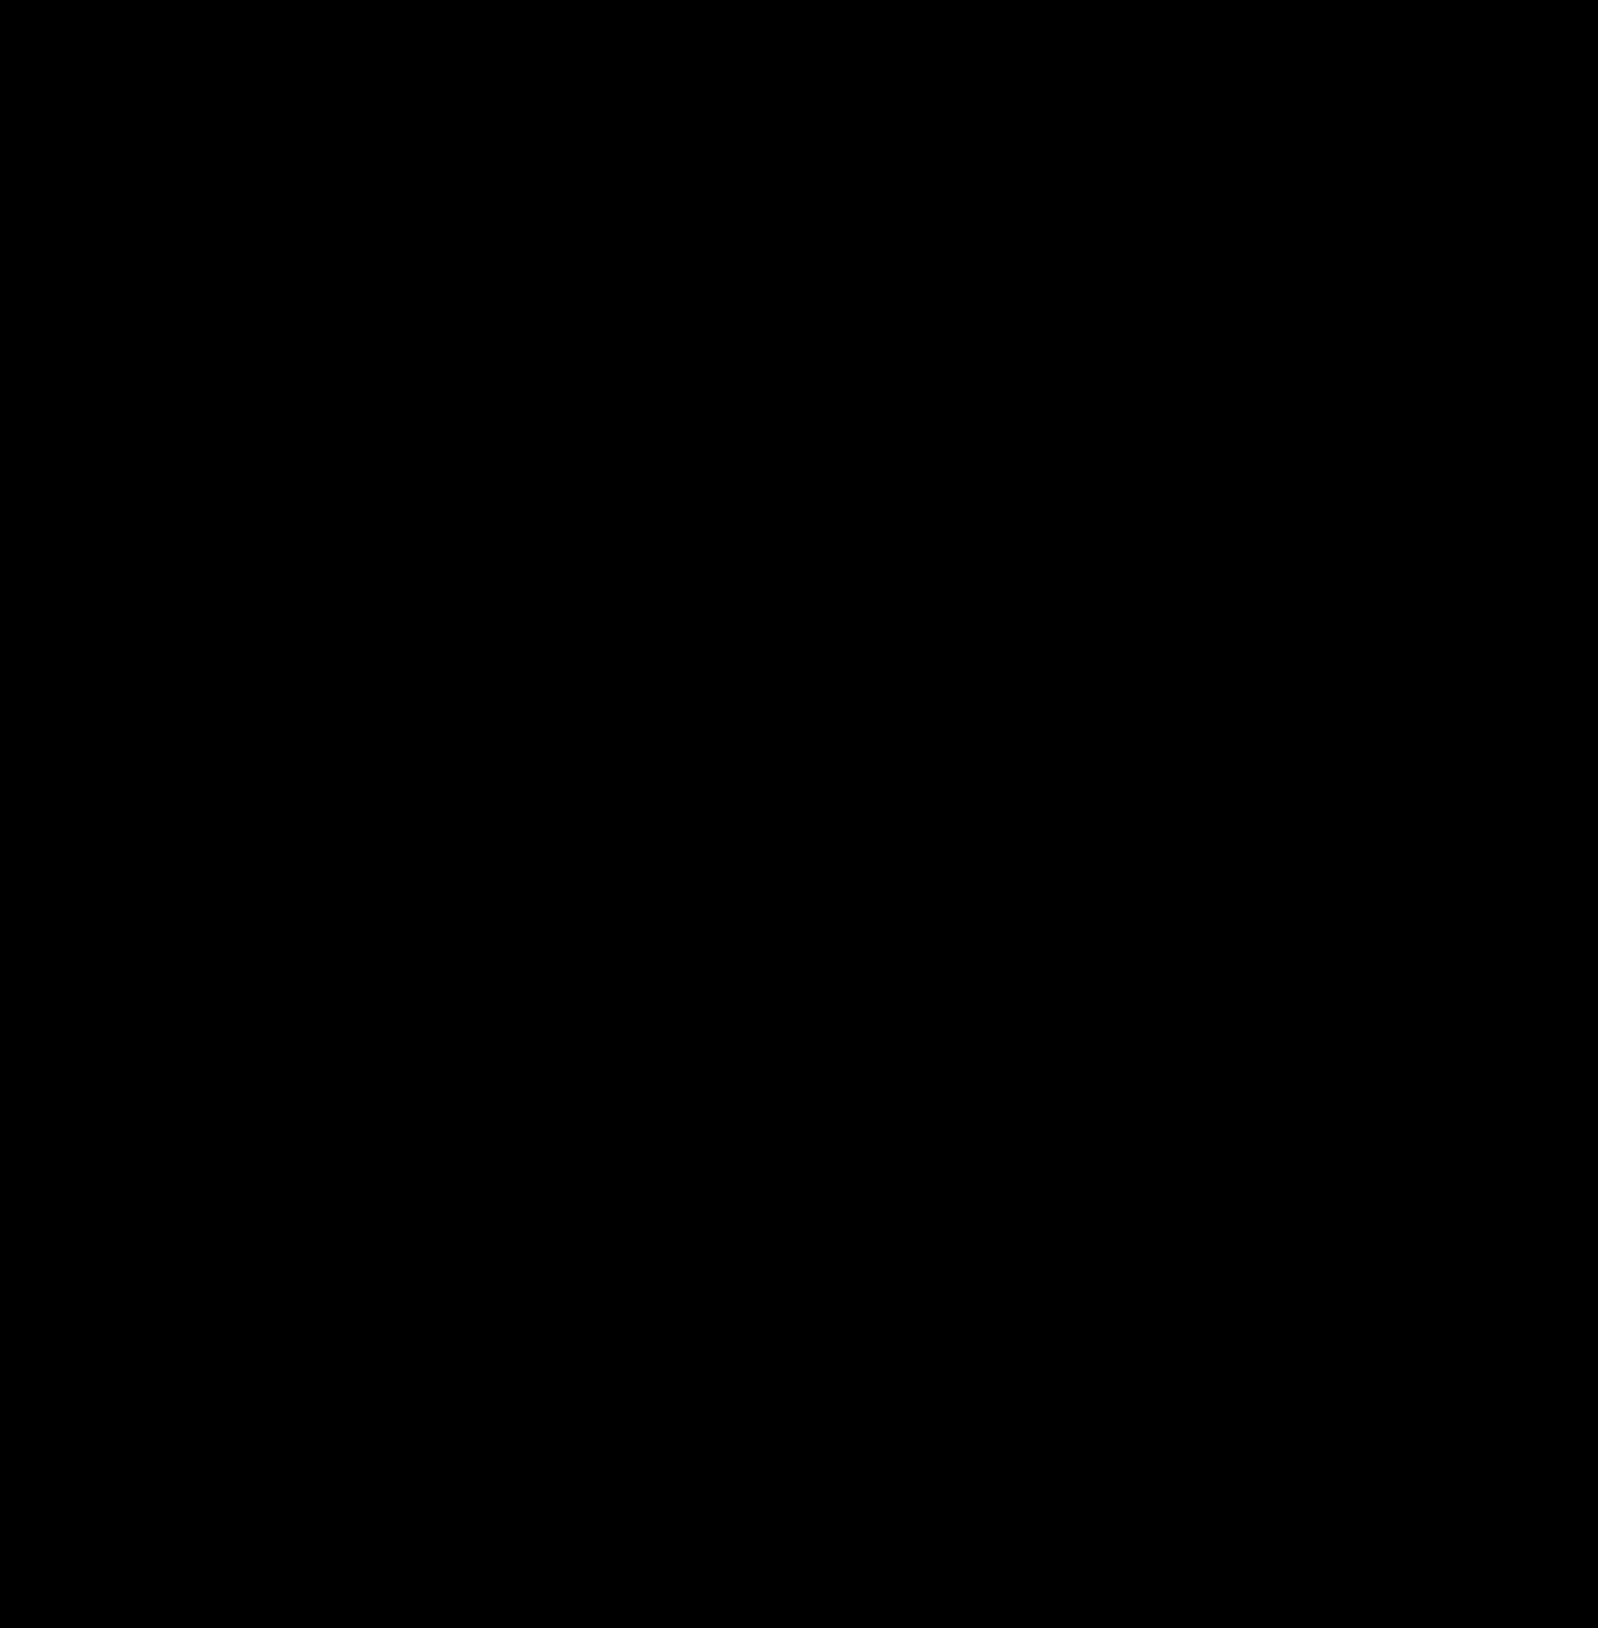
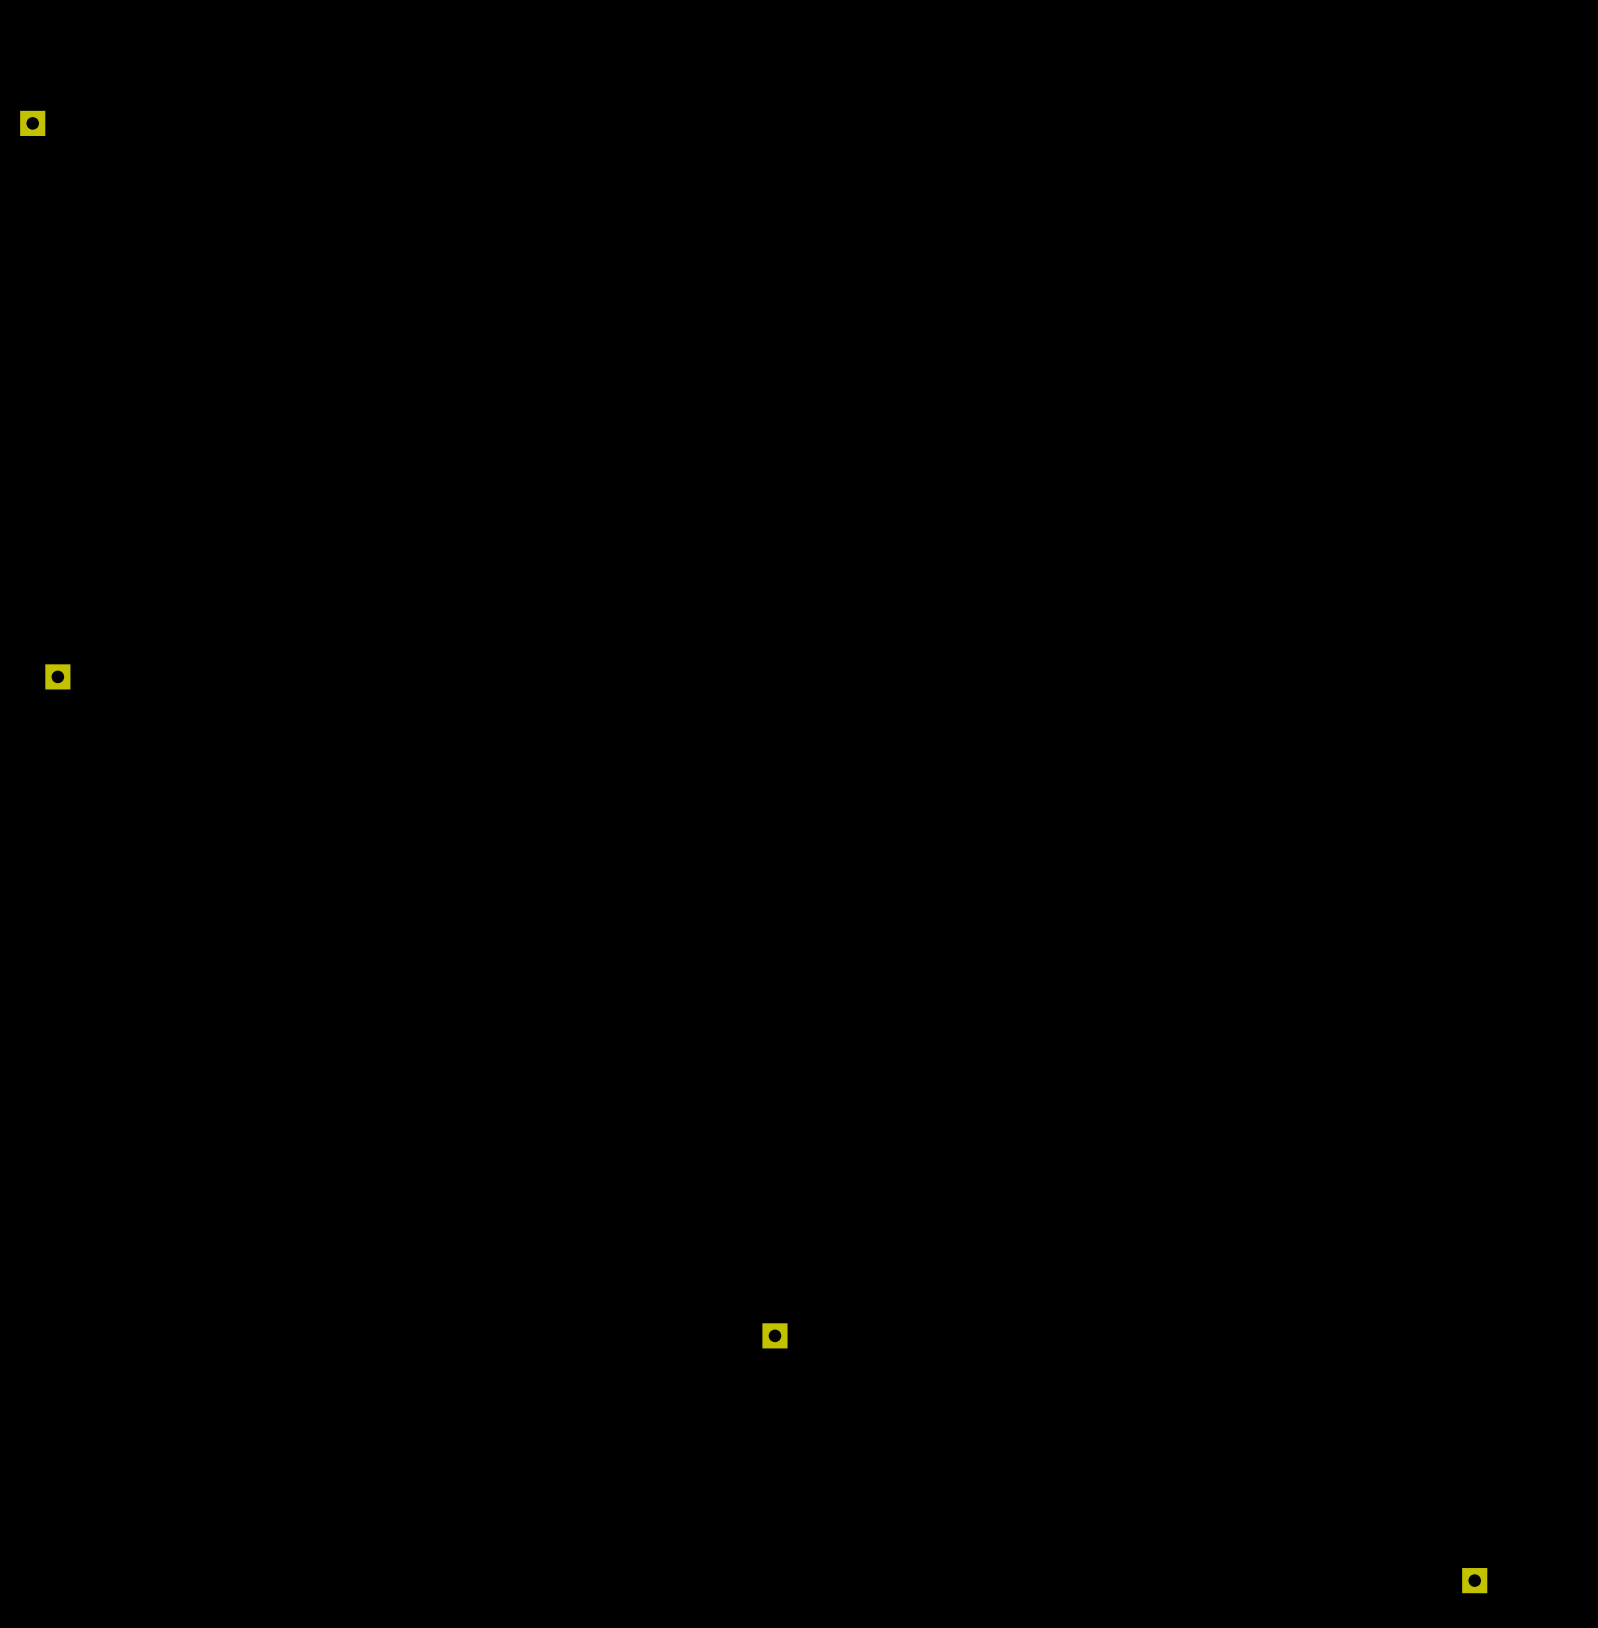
part: none -> (32, 123)
part: none -> (57, 676)
part: none -> (774, 1335)
part: none -> (1474, 1580)

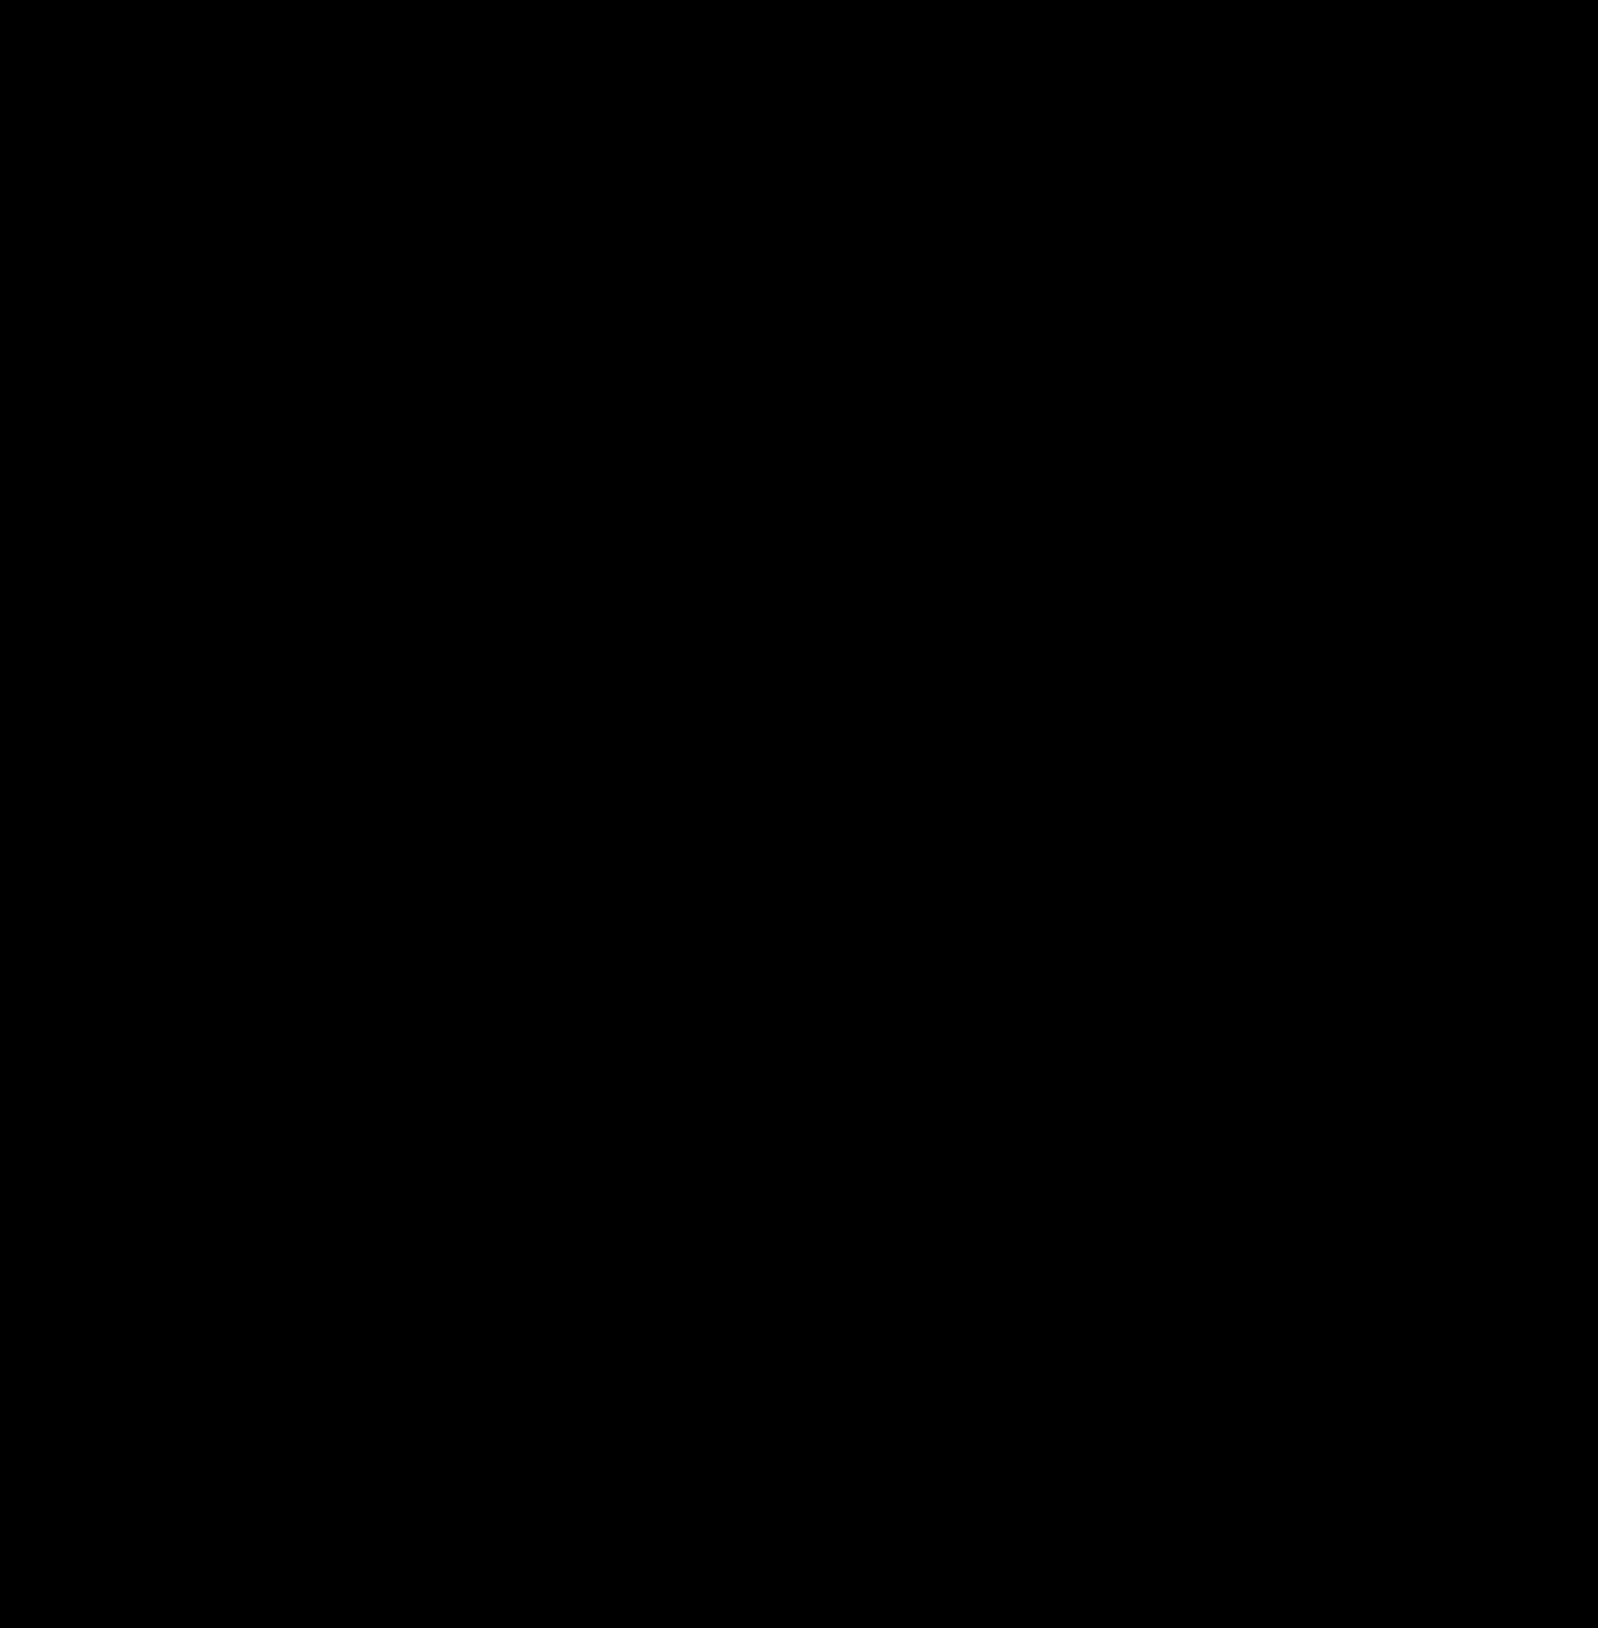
part: (32, 123) -> none
part: (57, 676) -> none
part: (774, 1335) -> none
part: (1474, 1580) -> none

